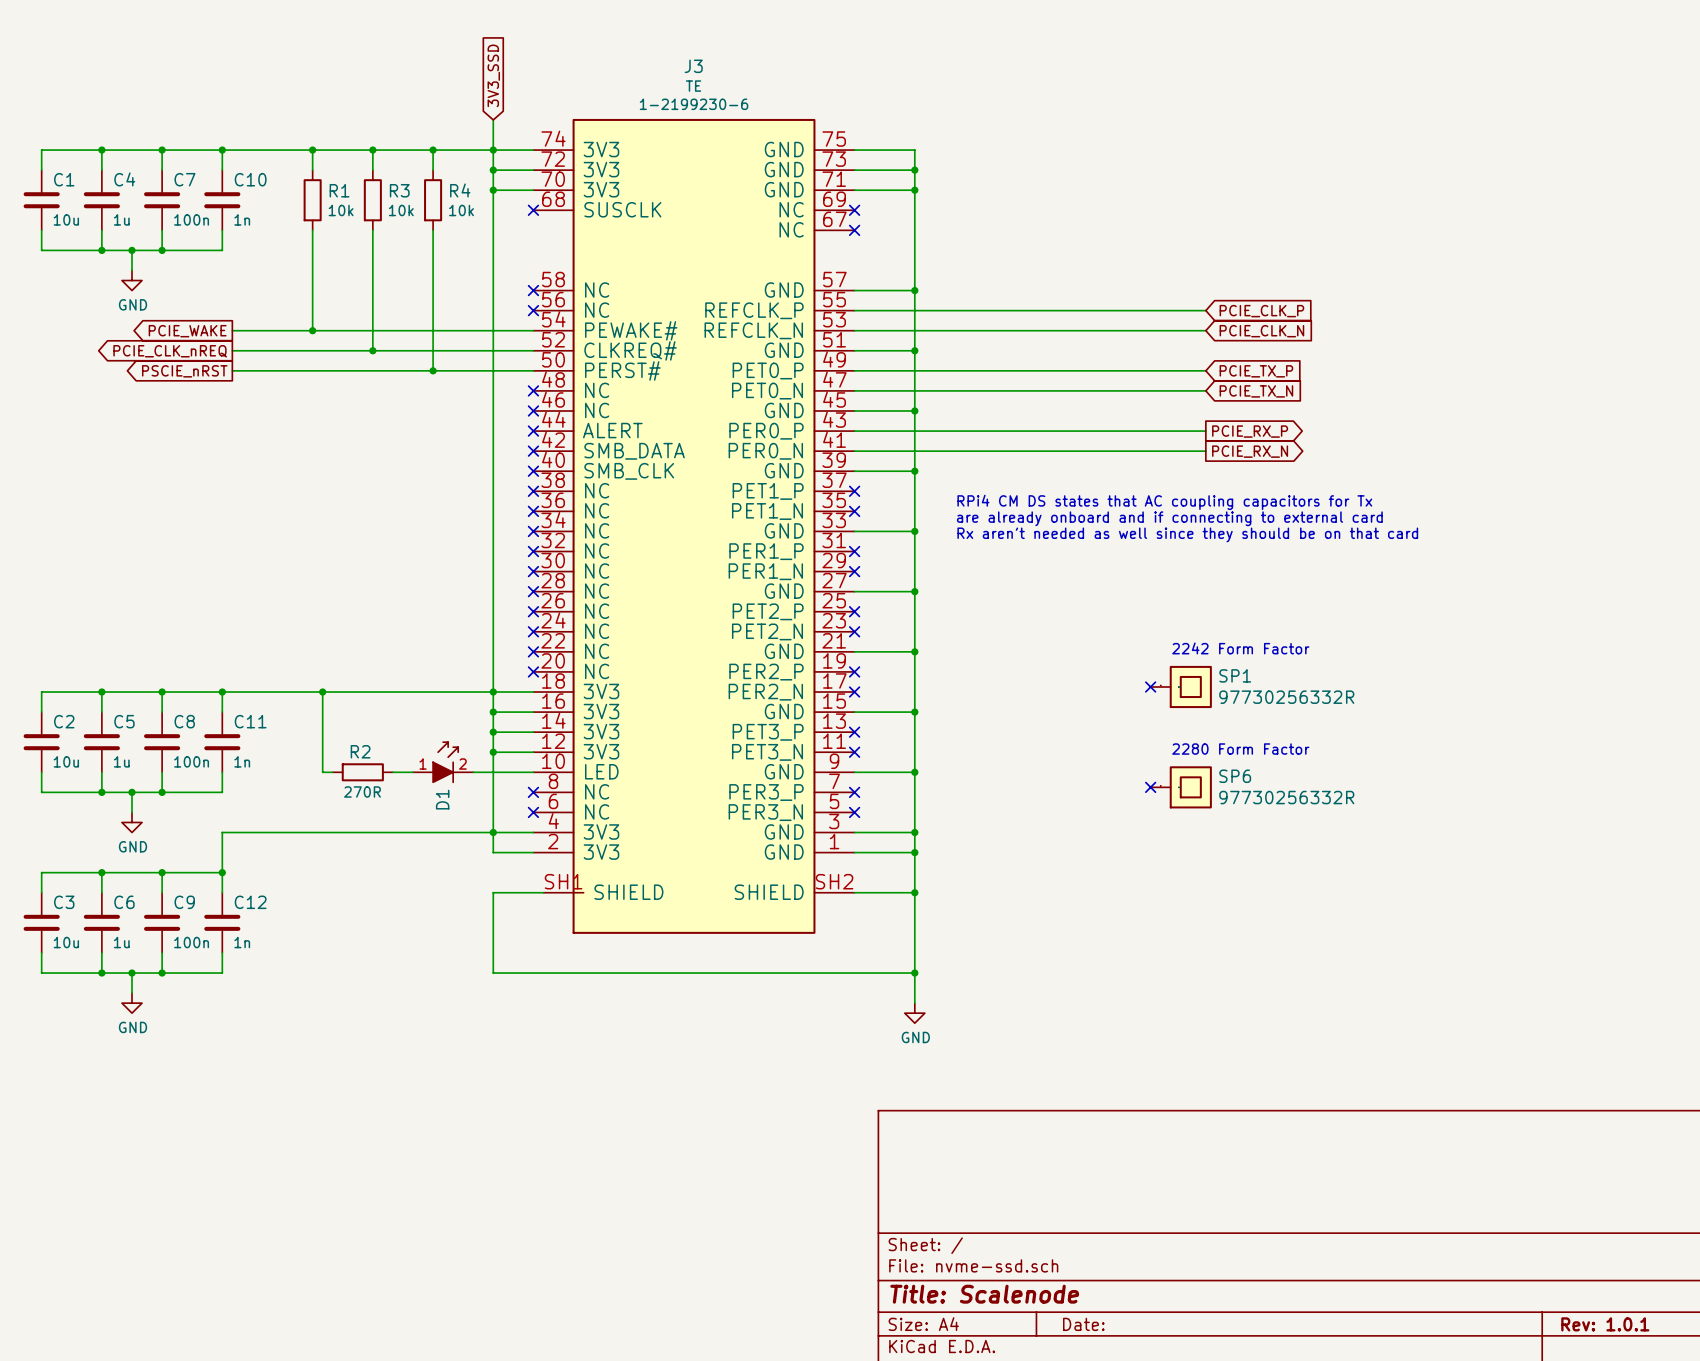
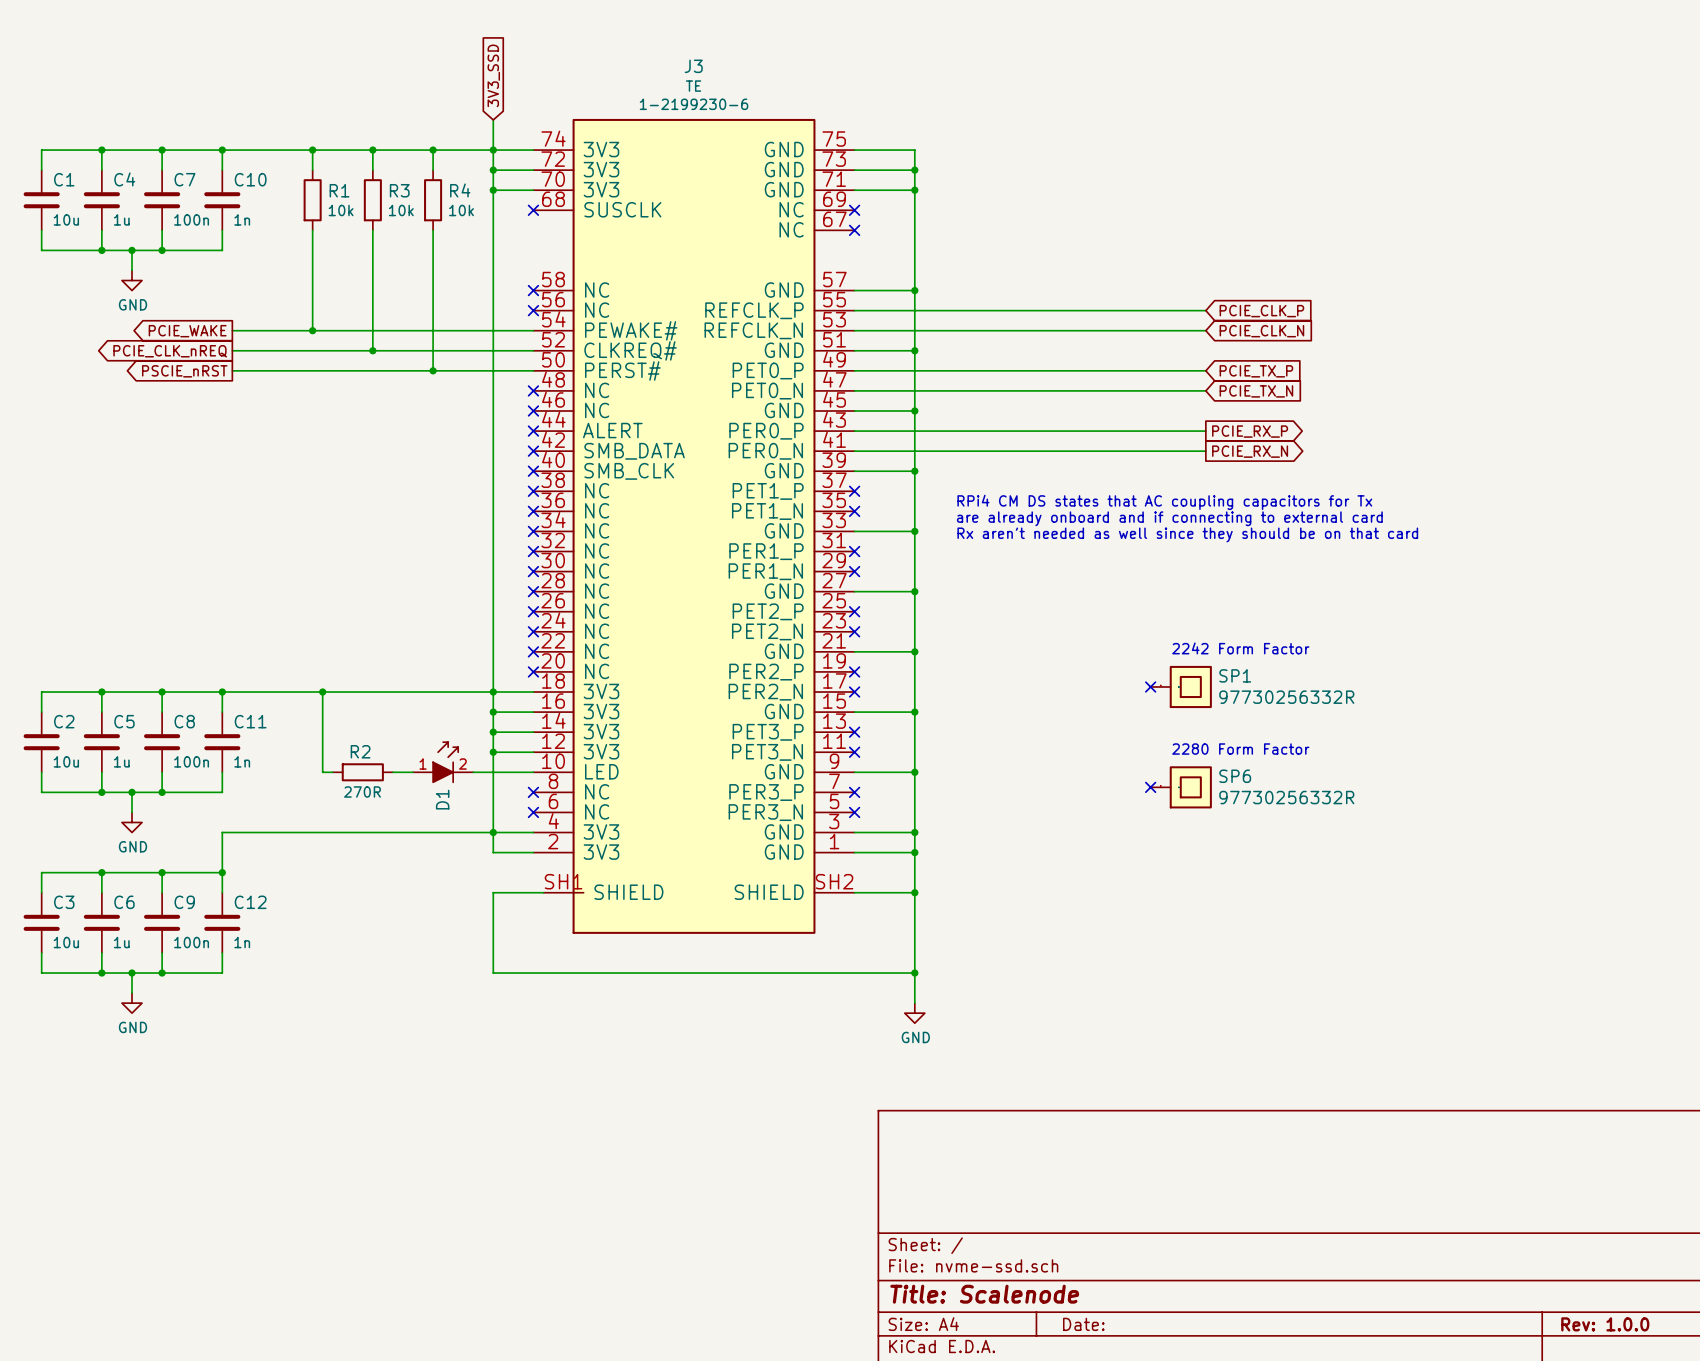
title block: Rev: 1.0.1 (1605, 1324) -> Rev: 1.0.0 (1605, 1324)

